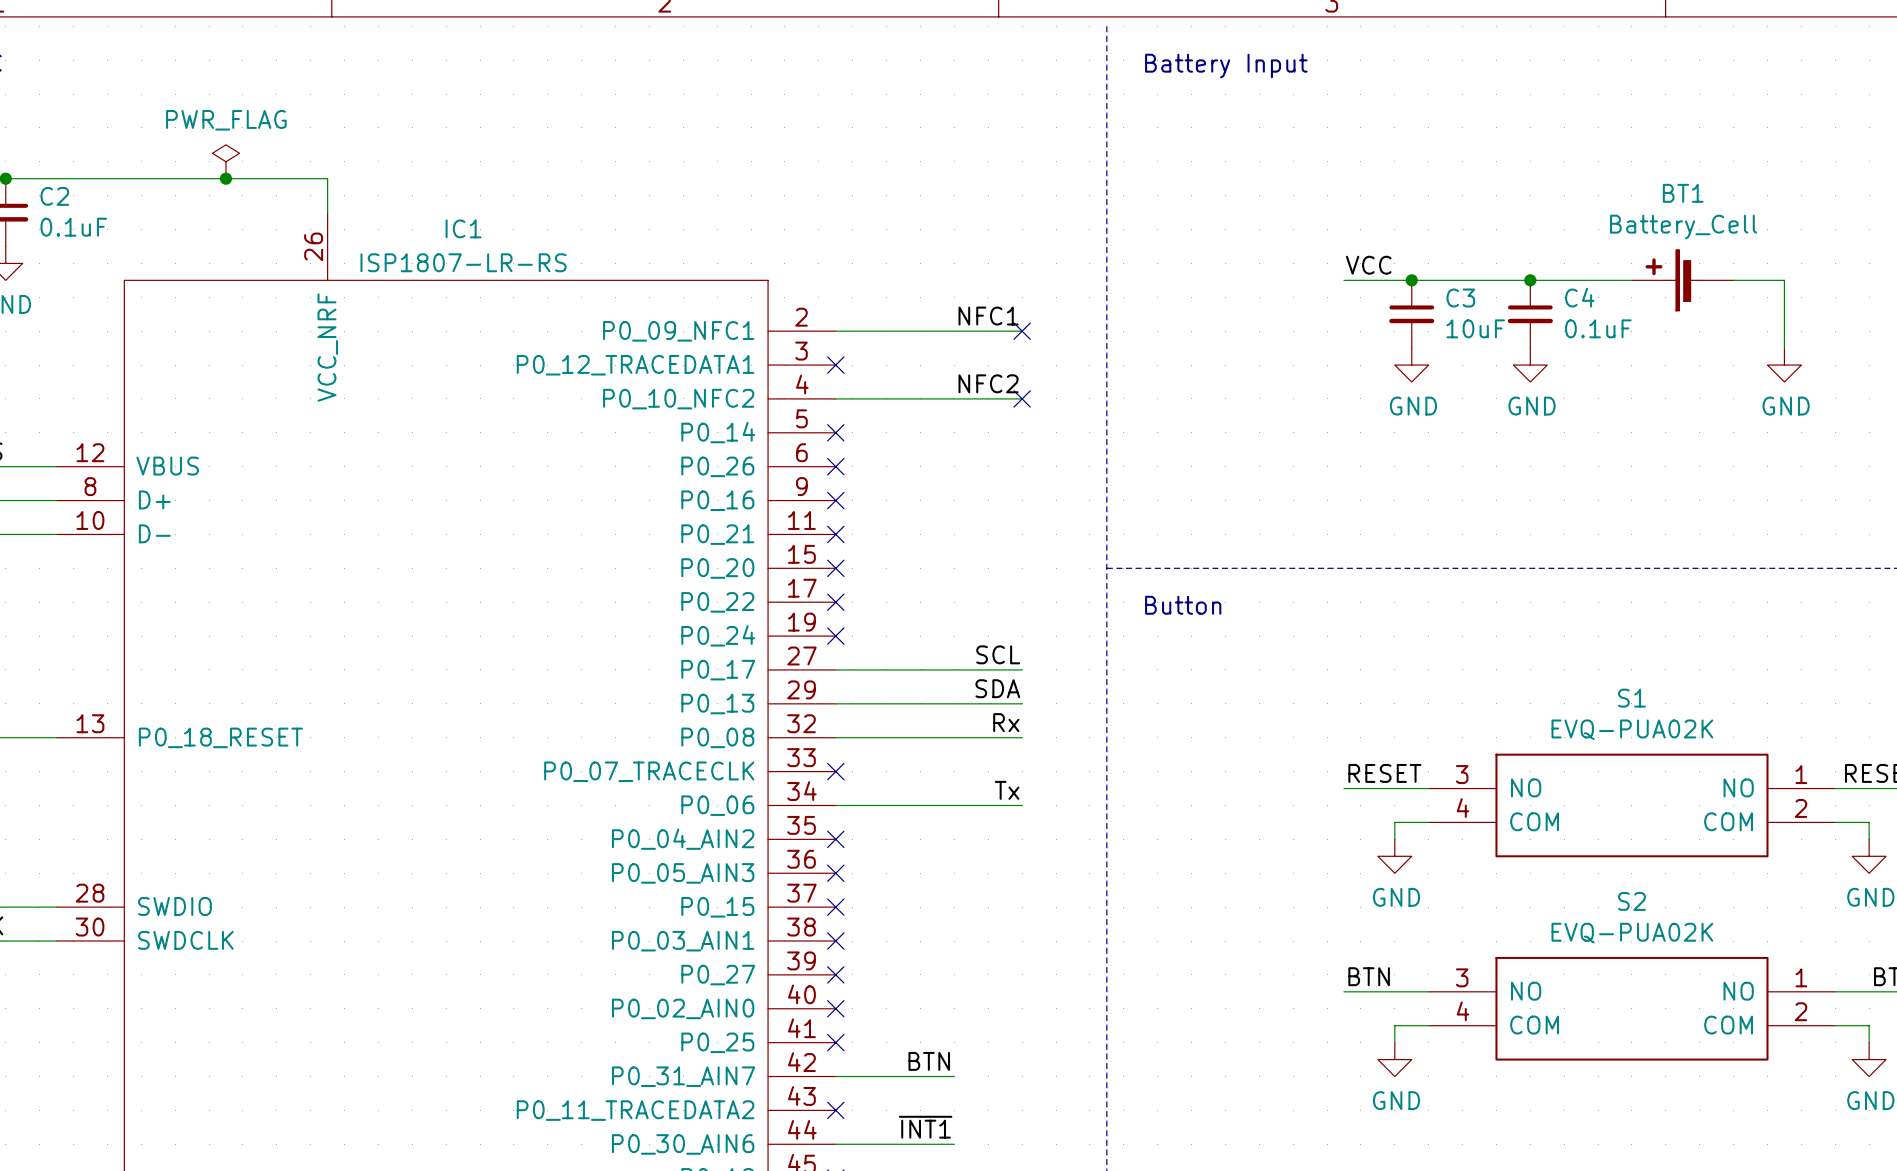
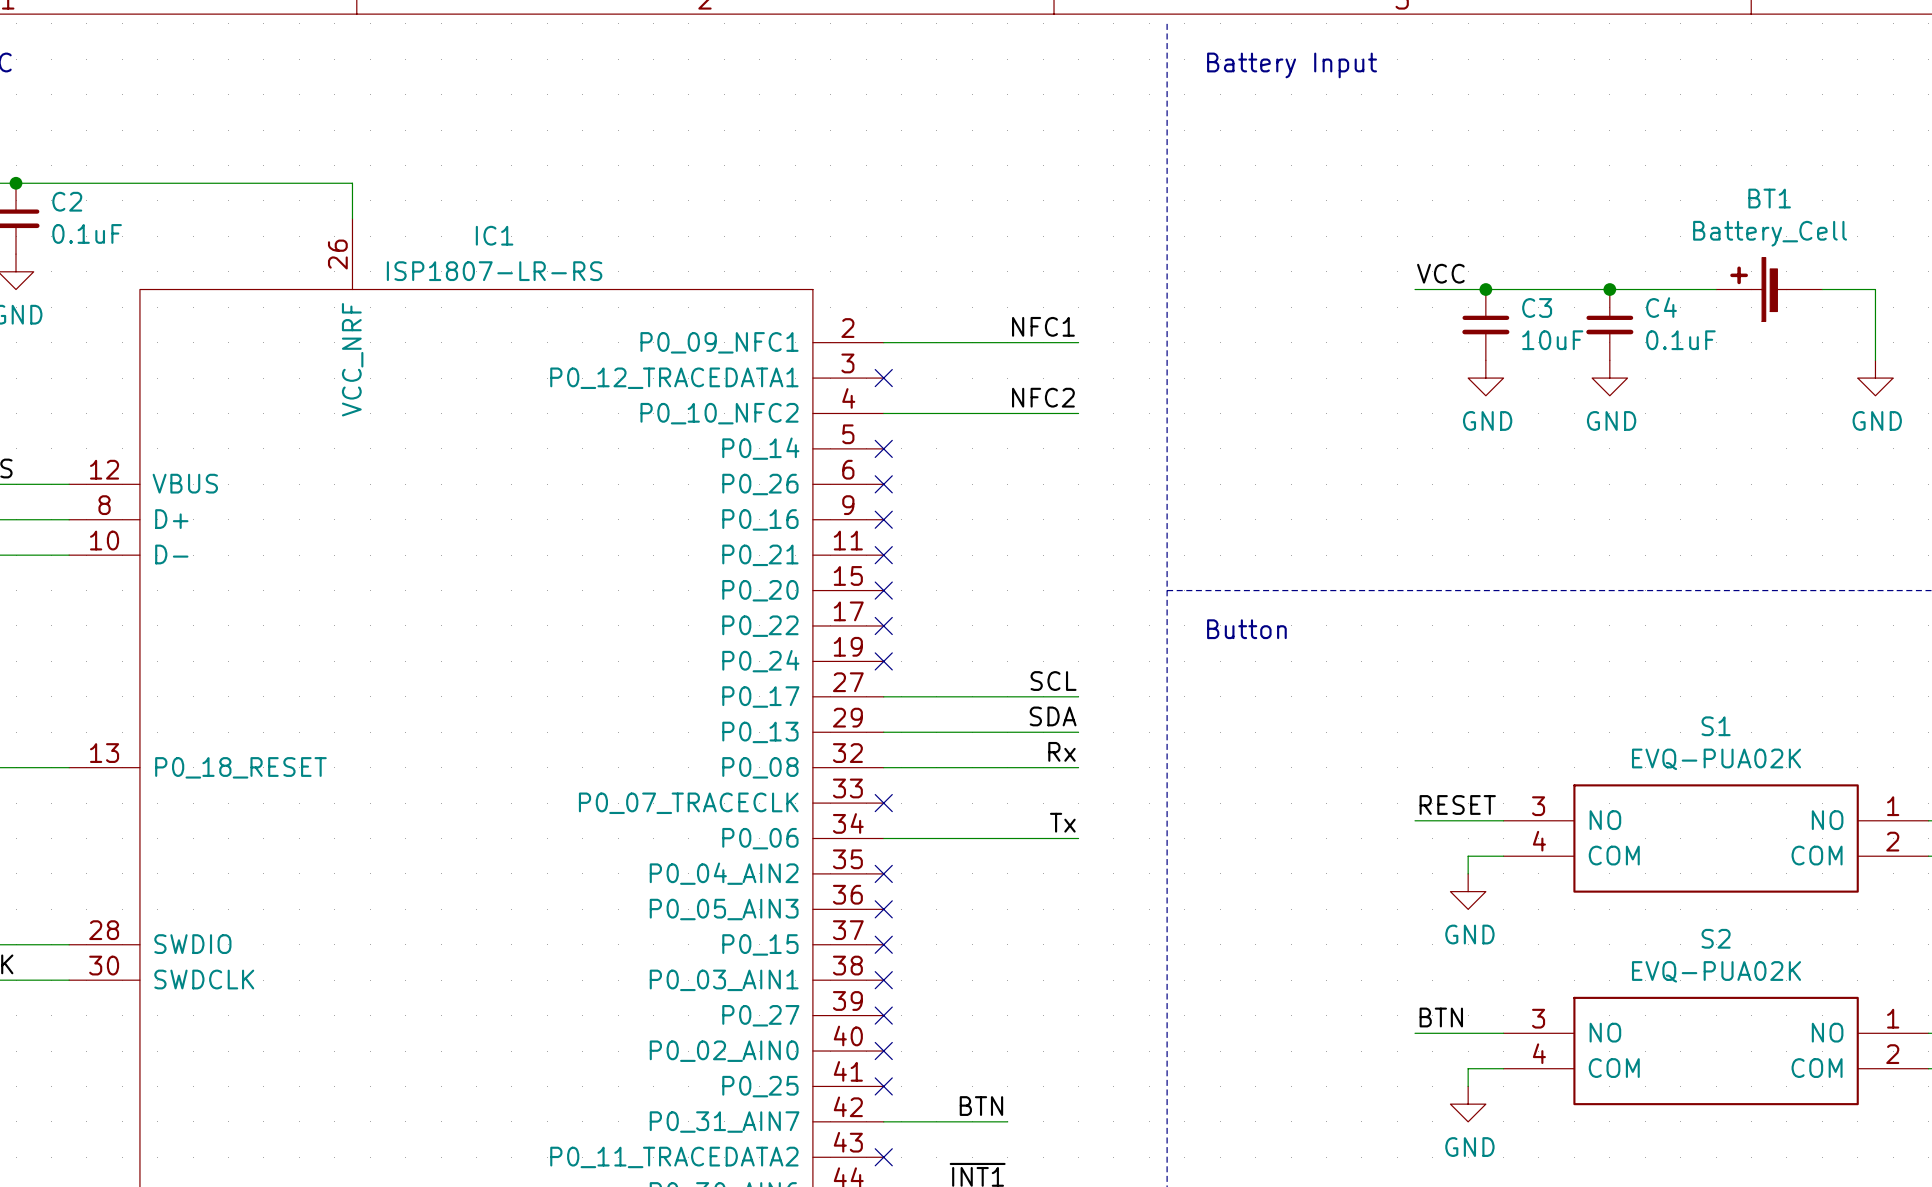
power symbol: PWR_FLAG (225, 161) -> none
junction: (225, 178) -> none
no-connect mark: (1022, 331) -> none
no-connect mark: (1022, 398) -> none

